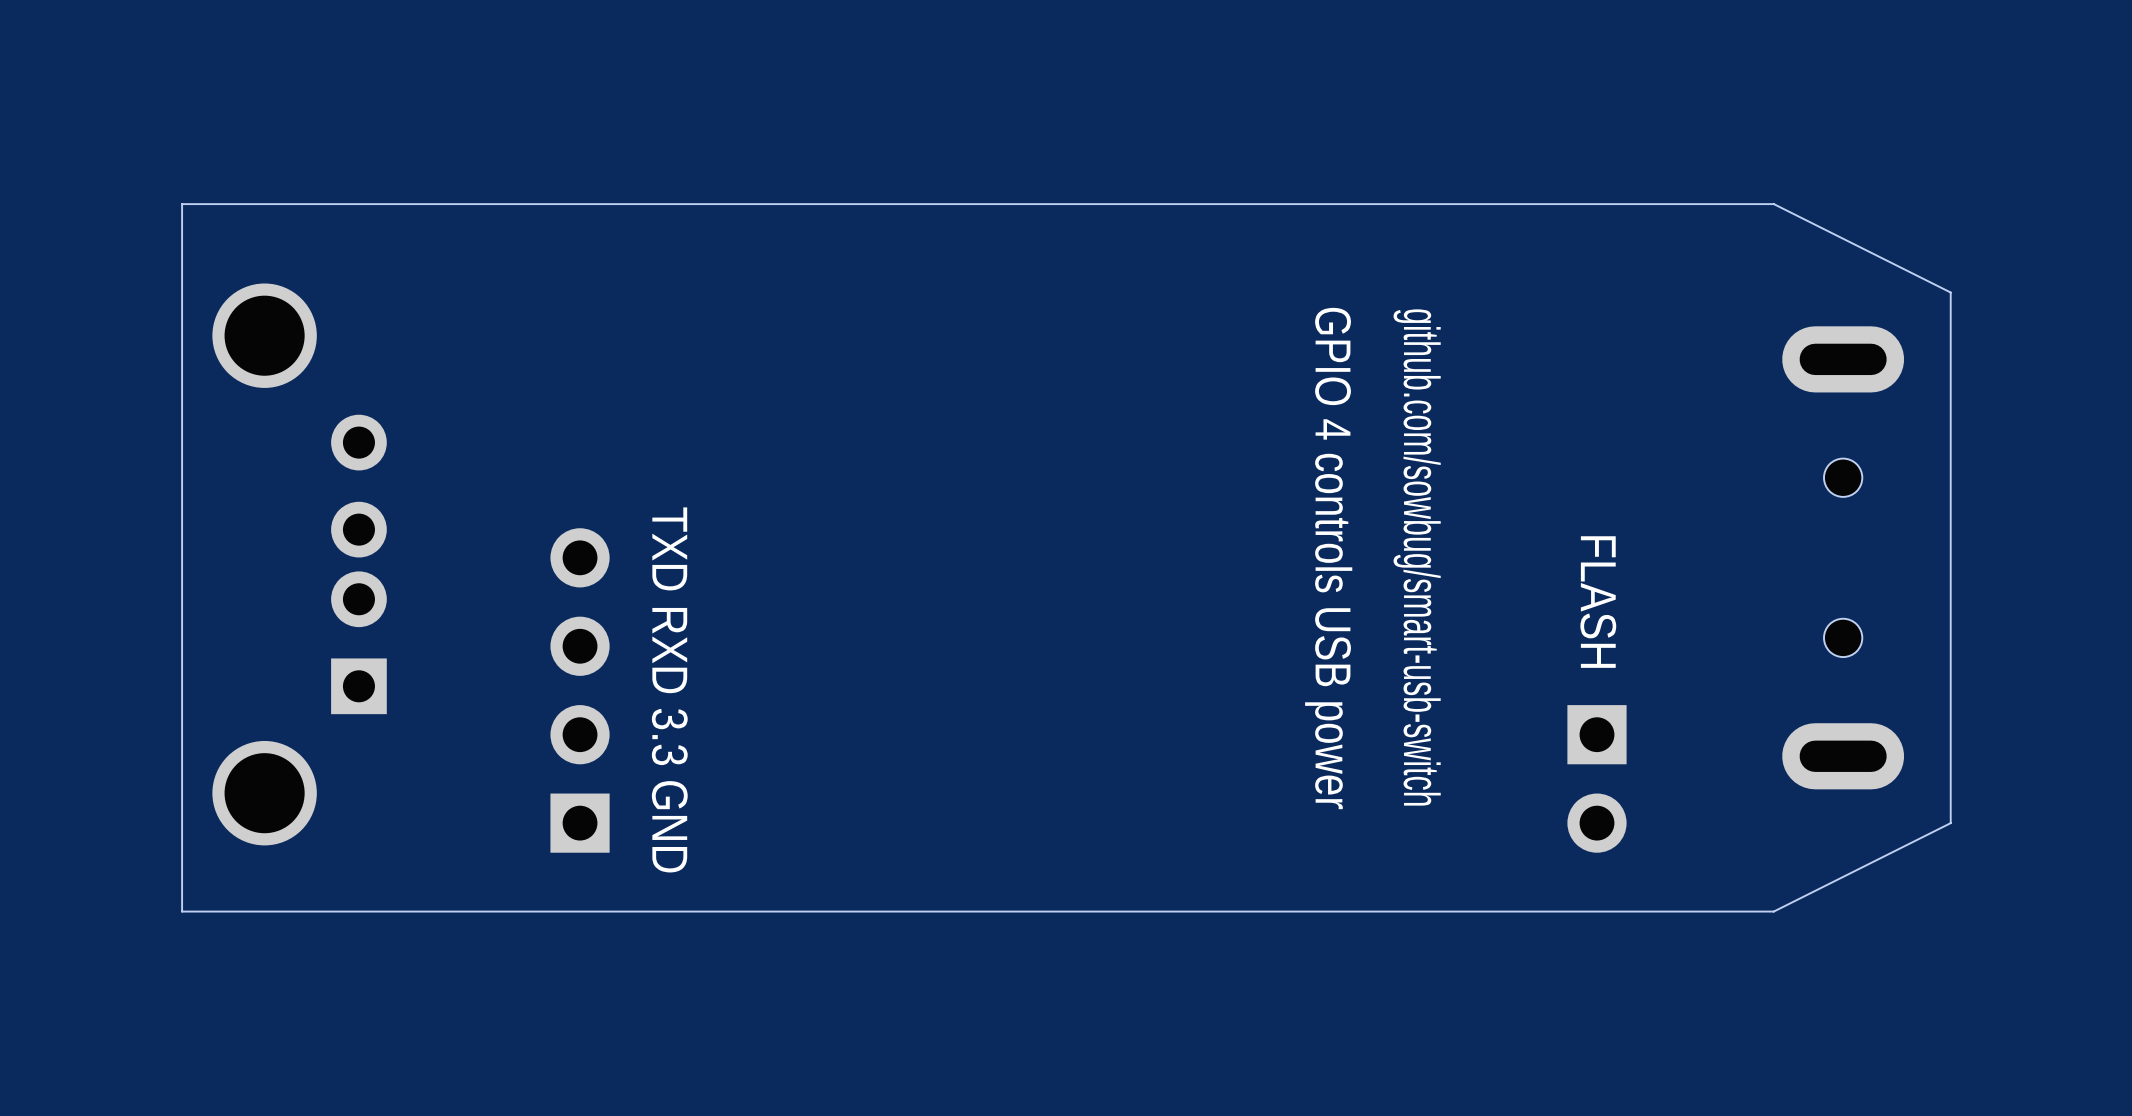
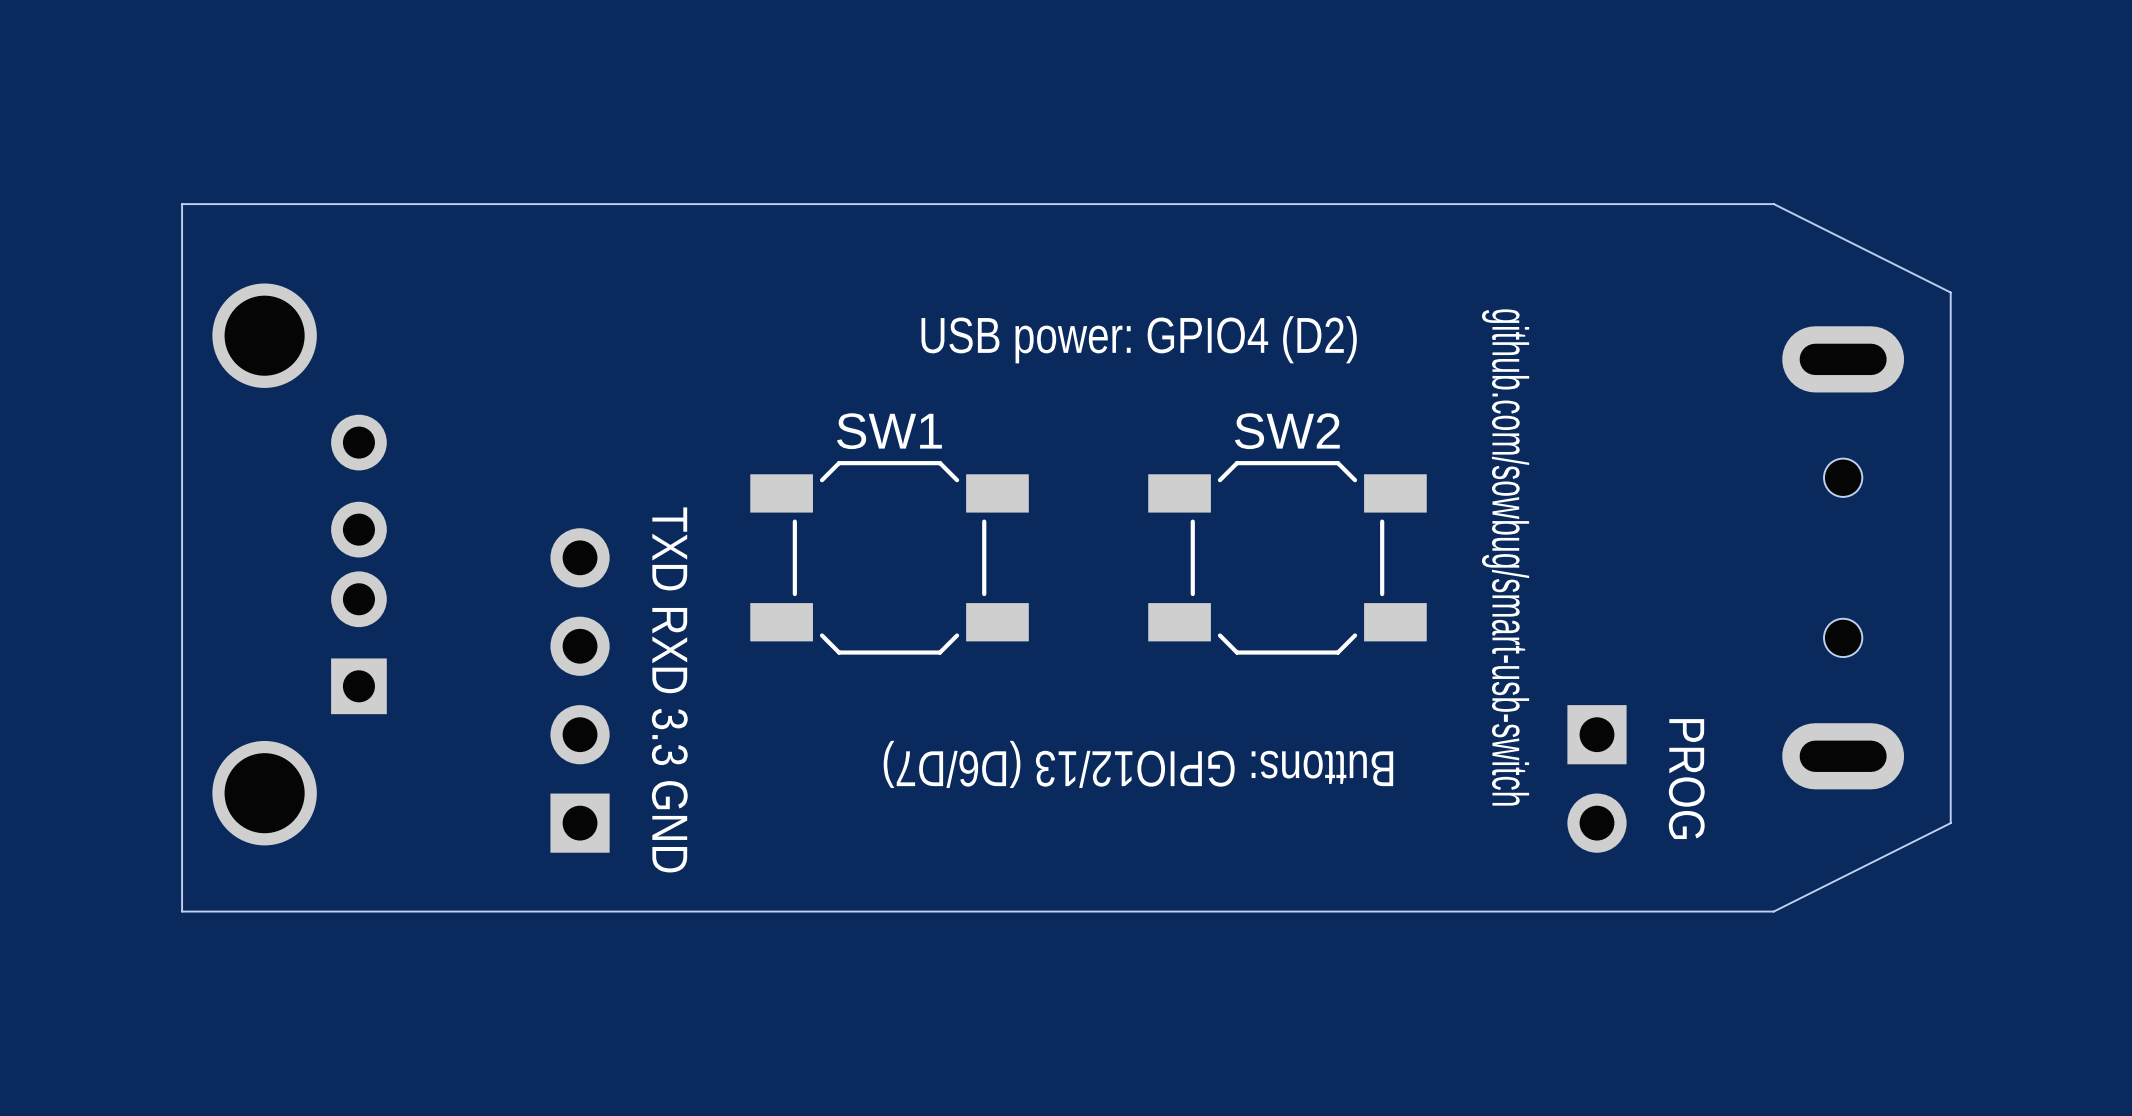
text: none -> USB power: GPIO4 (D2) (1139, 339)
SW1: none -> (889, 557)
SW2: none -> (1287, 557)
text position: github.com/sowbug/smart-usb-switch (1417, 557) -> github.com/sowbug/smart-usb-switch (1505, 557)
text: GPIO 4 controls USB power (1328, 558) -> none
text: FLASH (1598, 602) -> none
text: none -> Buttons: GPIO12/13 (D6/D7) (1138, 764)
text: none -> PROG (1686, 779)

